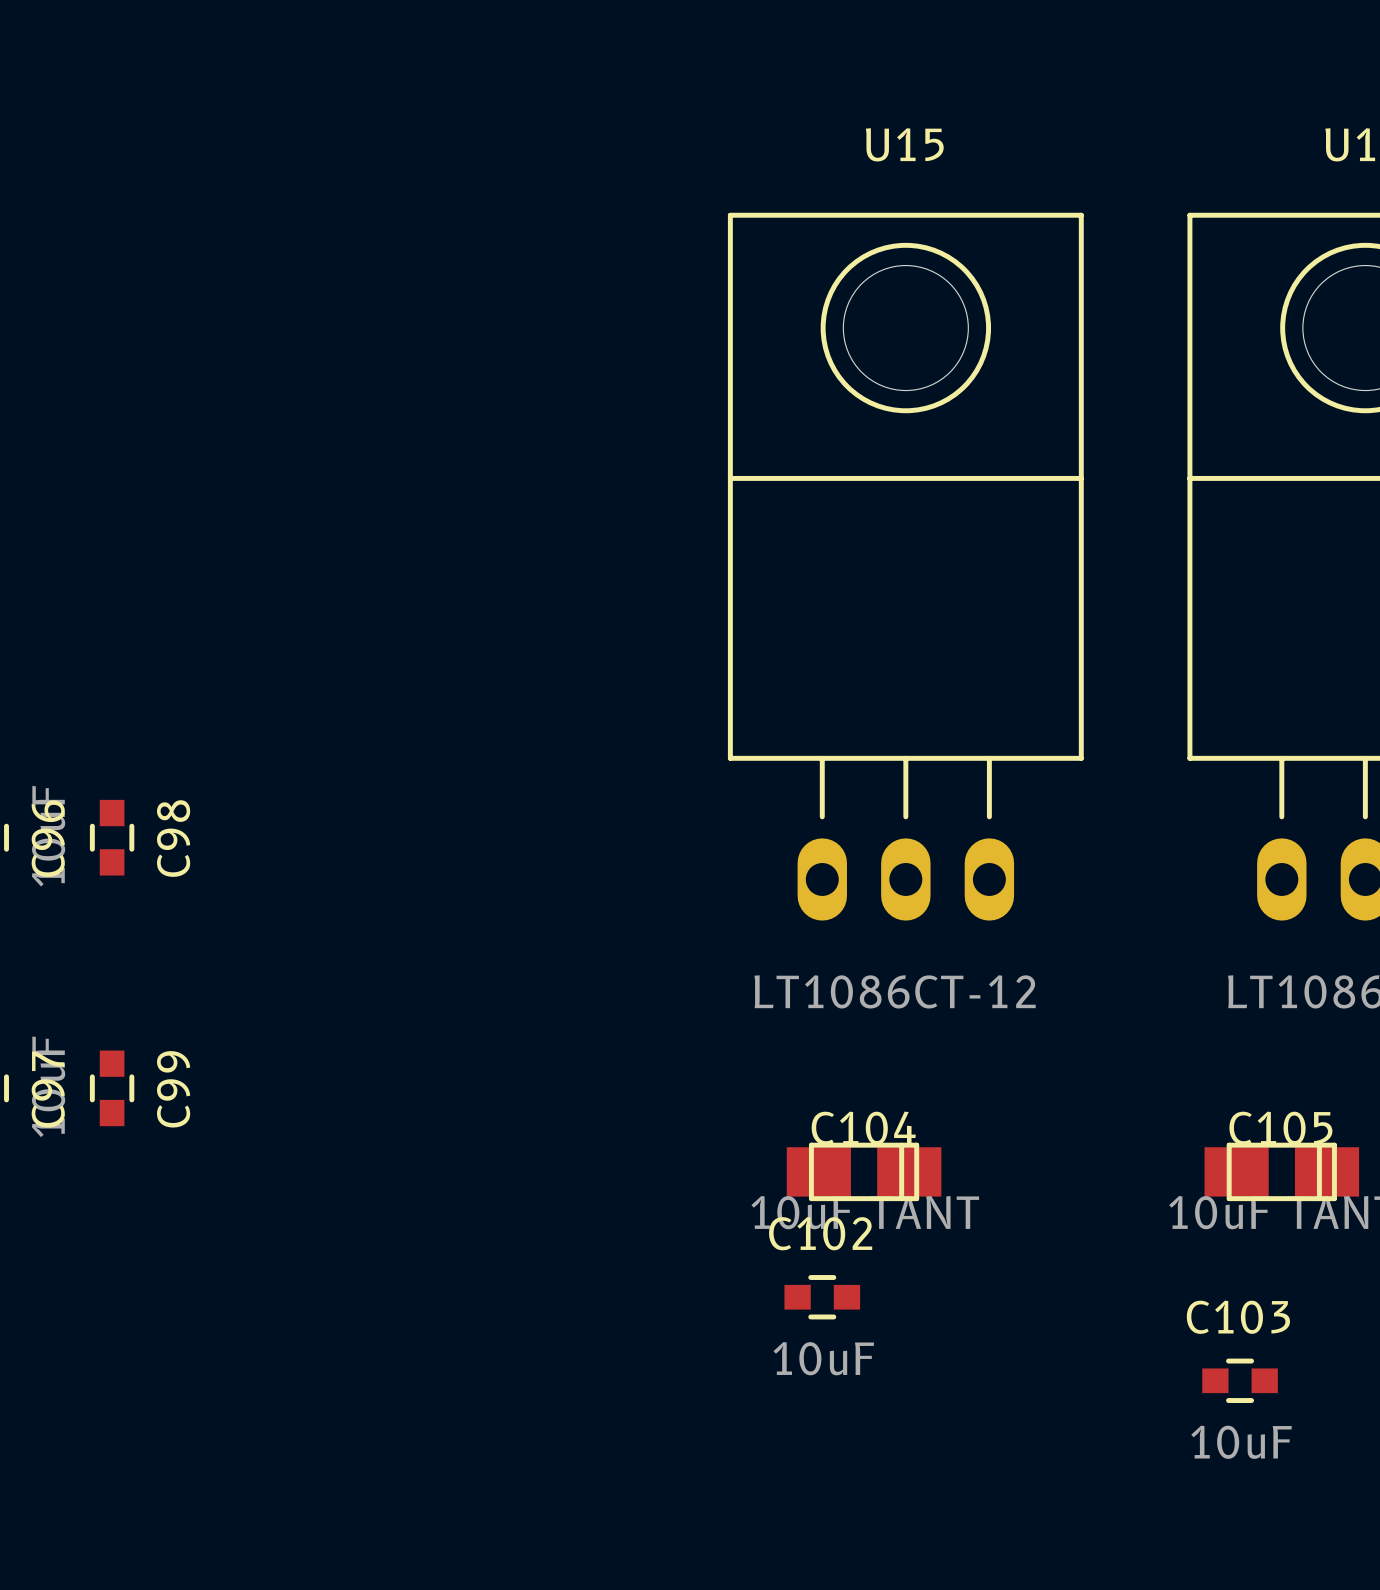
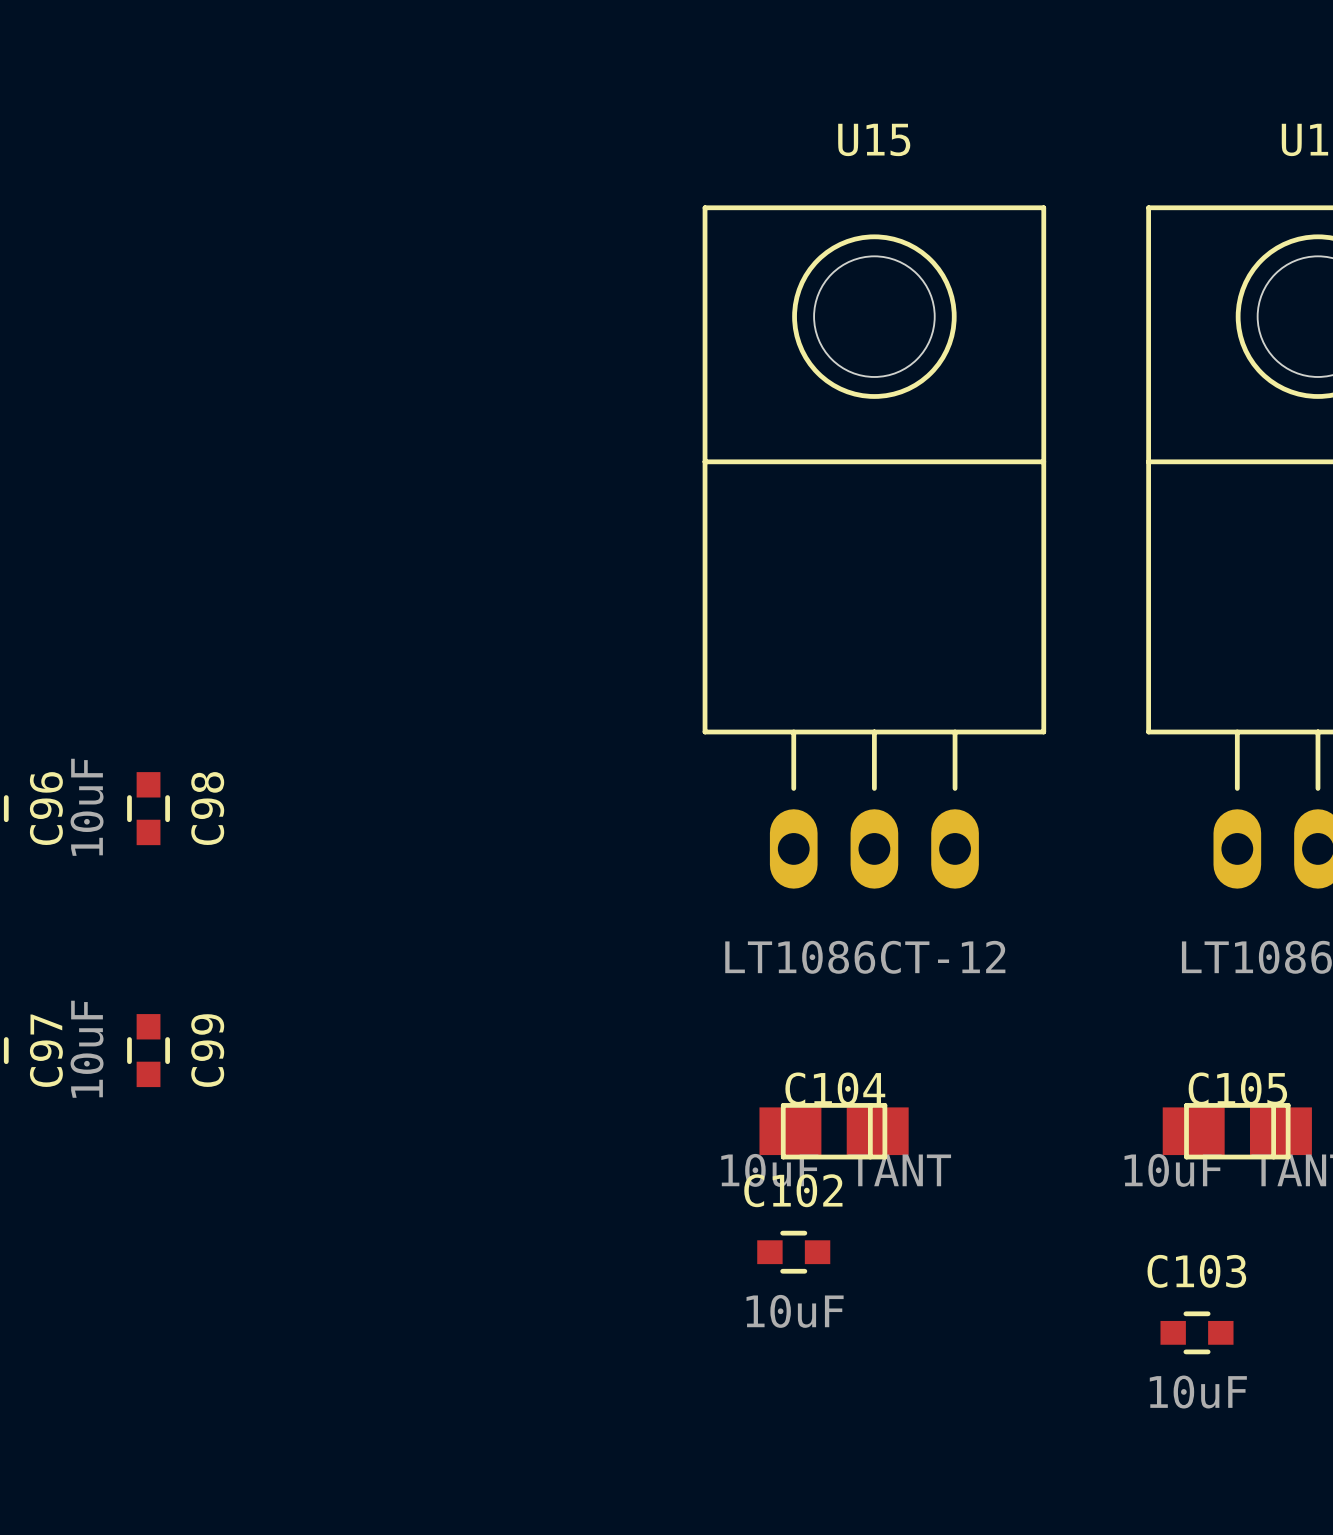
C98 position: (112, 837) -> (148, 808)
C99 position: (112, 1088) -> (148, 1050)

